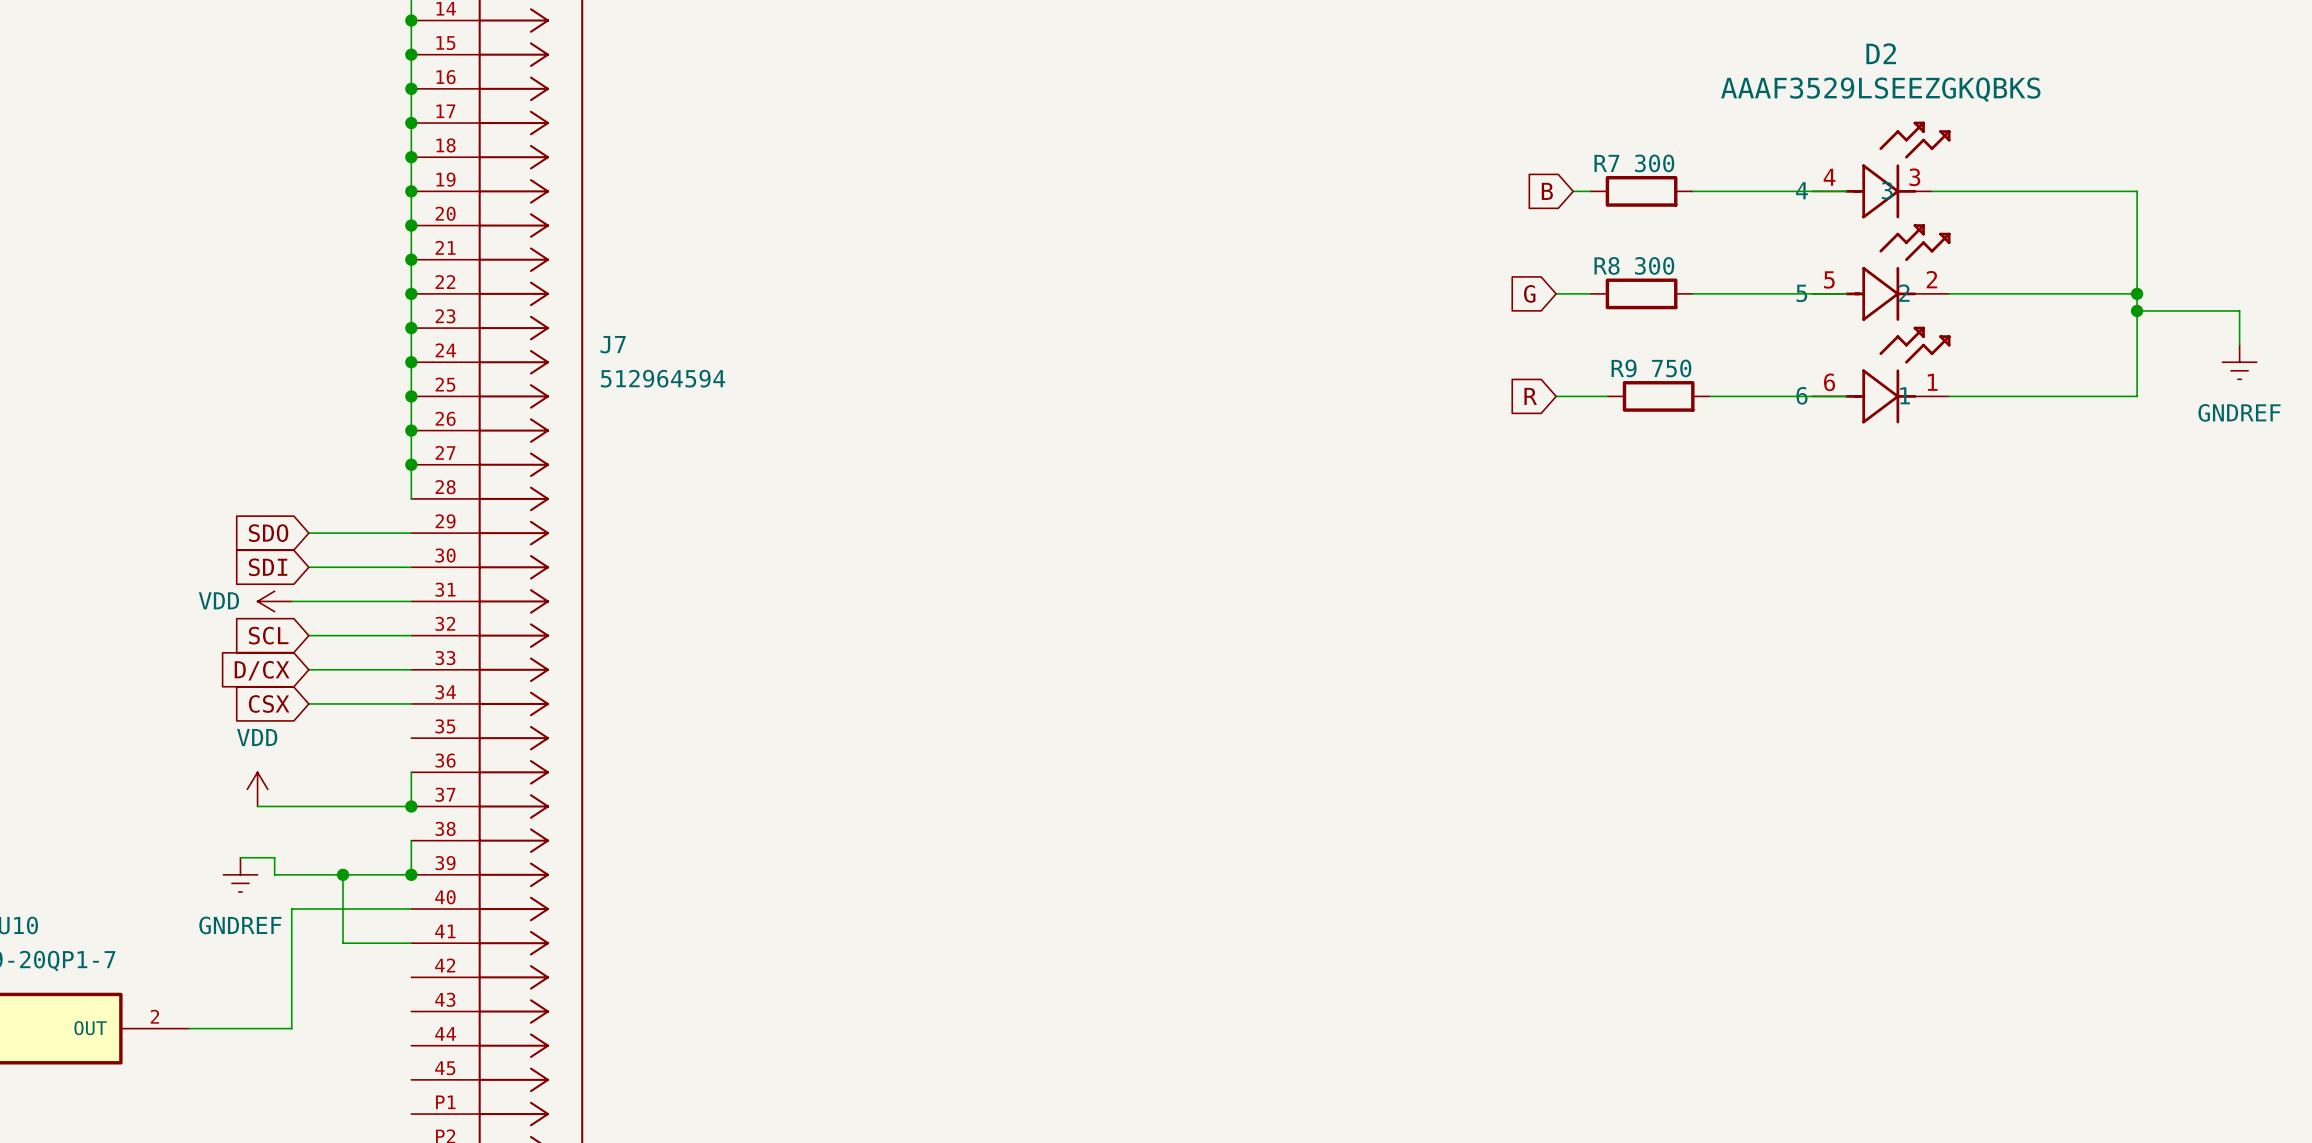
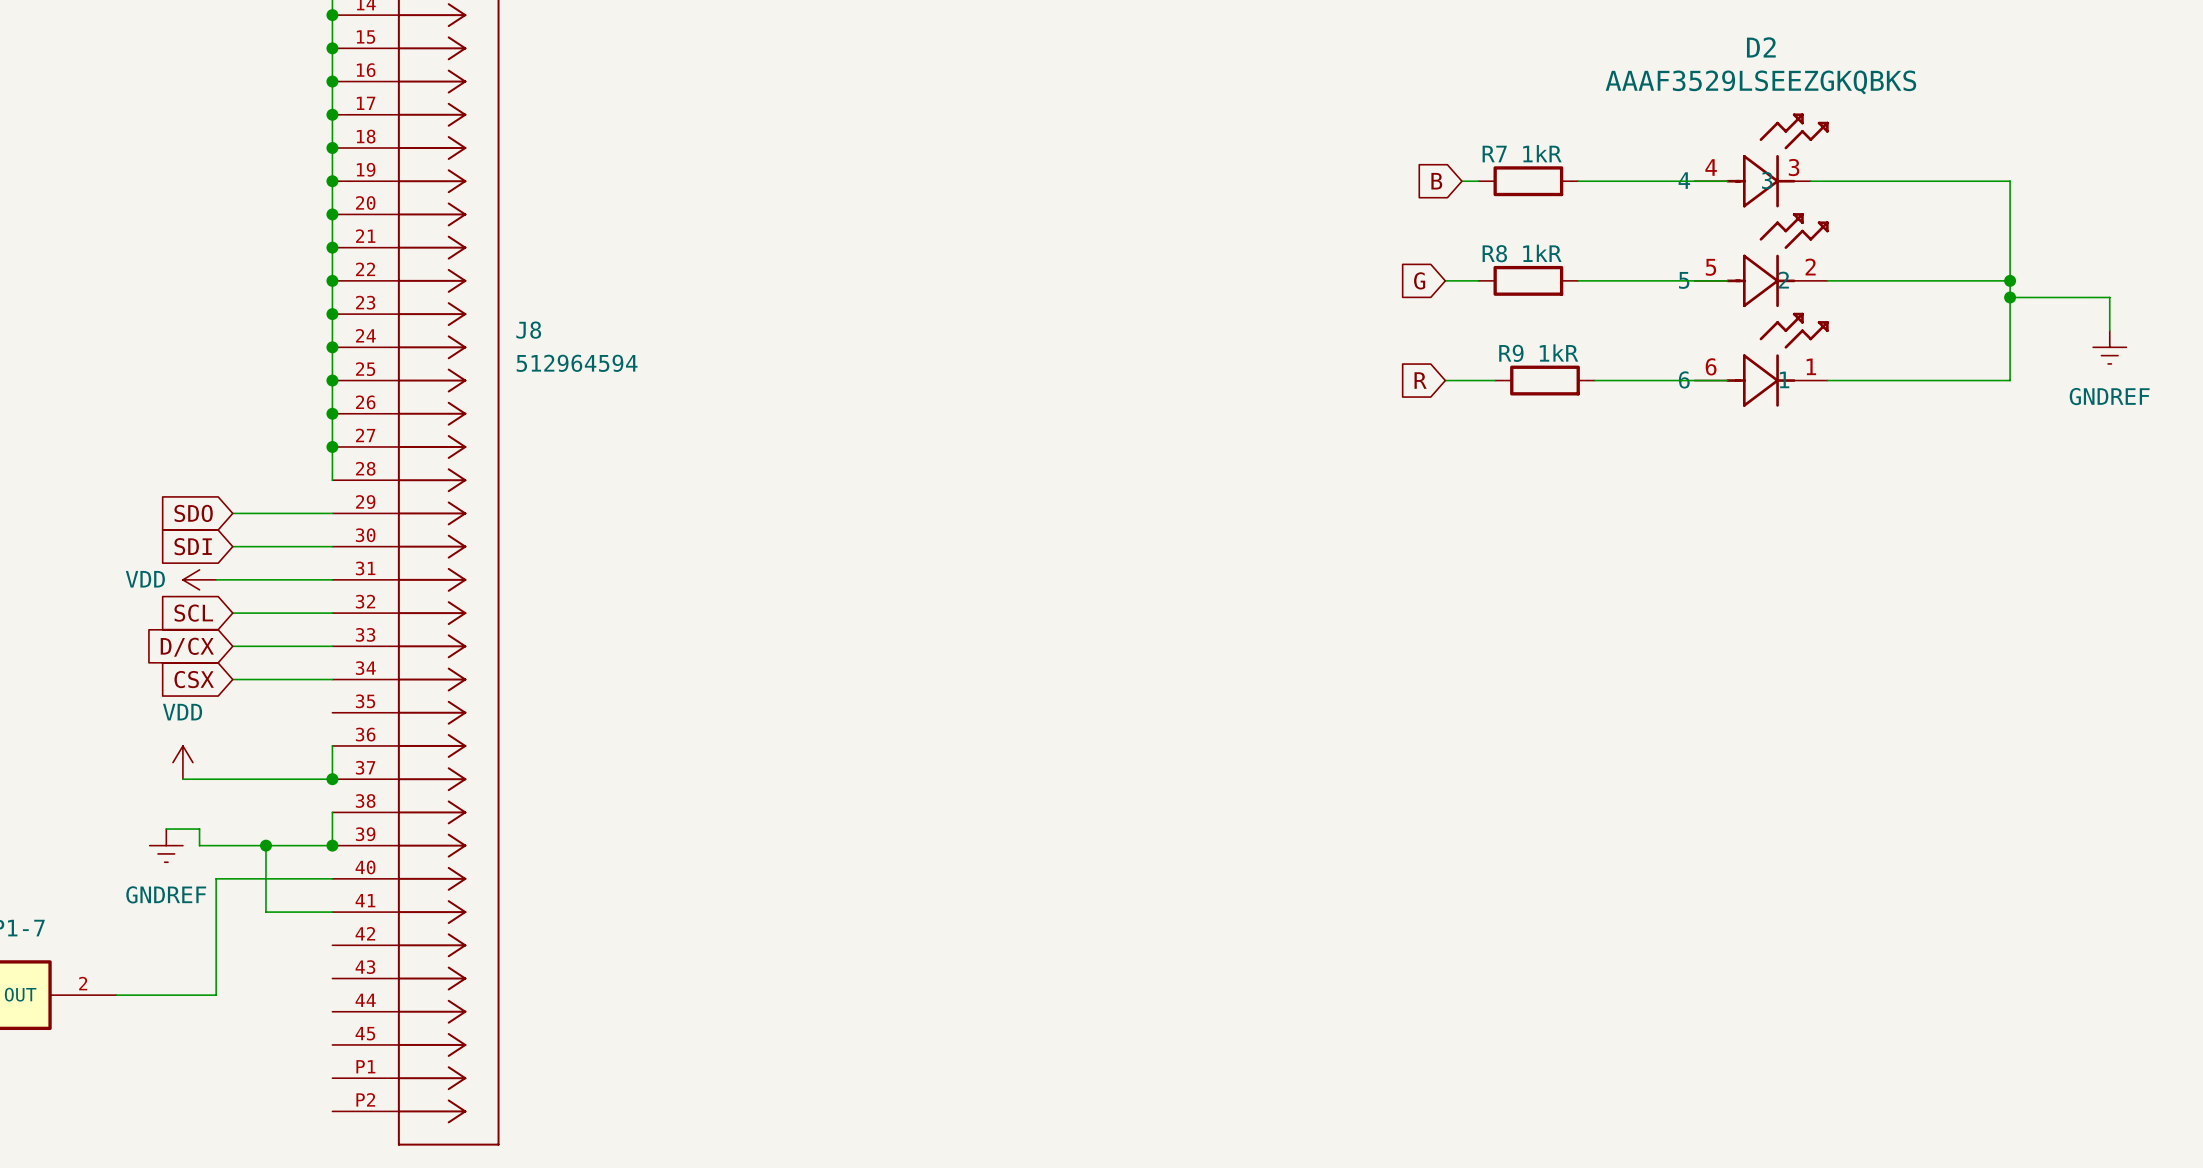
R7 value: 300 (1654, 163) -> 1kR (1542, 153)
R8 value: 300 (1654, 265) -> 1kR (1542, 253)
J7 name: J7 (613, 344) -> J8 (528, 330)
R9 value: 750 (1671, 368) -> 1kR (1559, 352)

